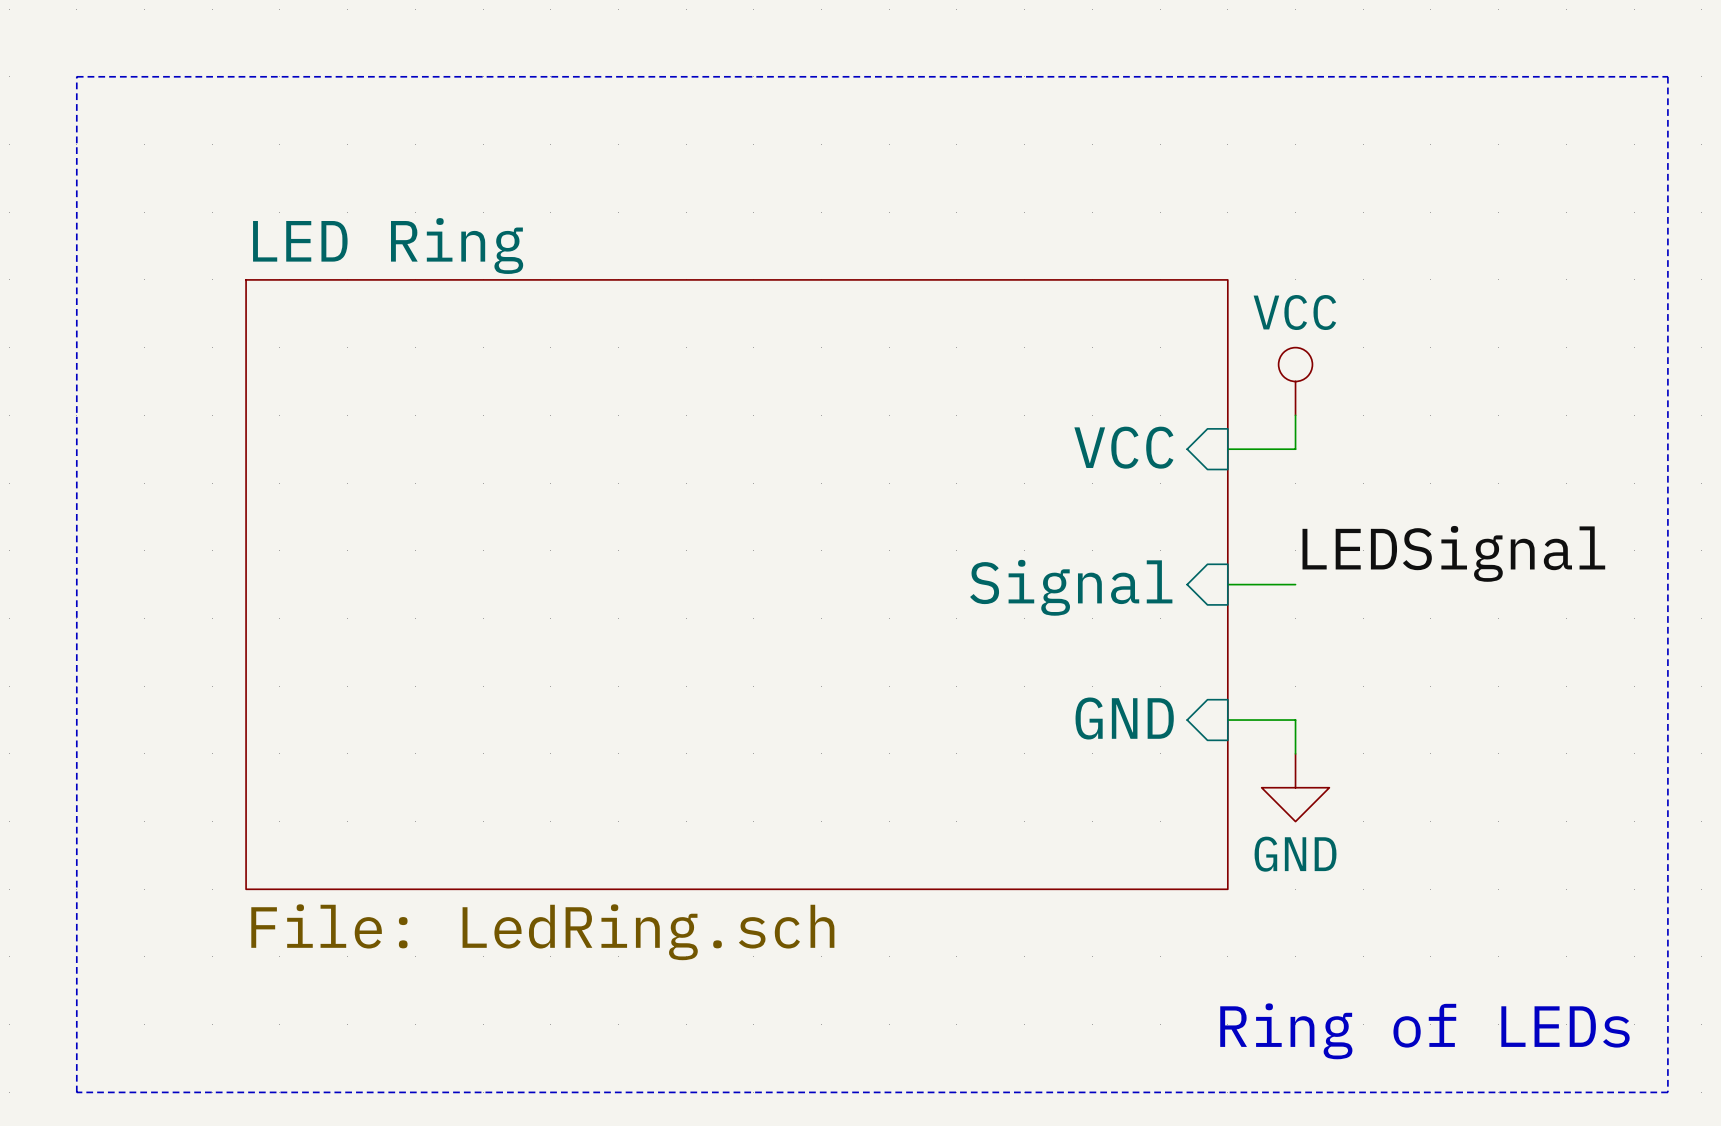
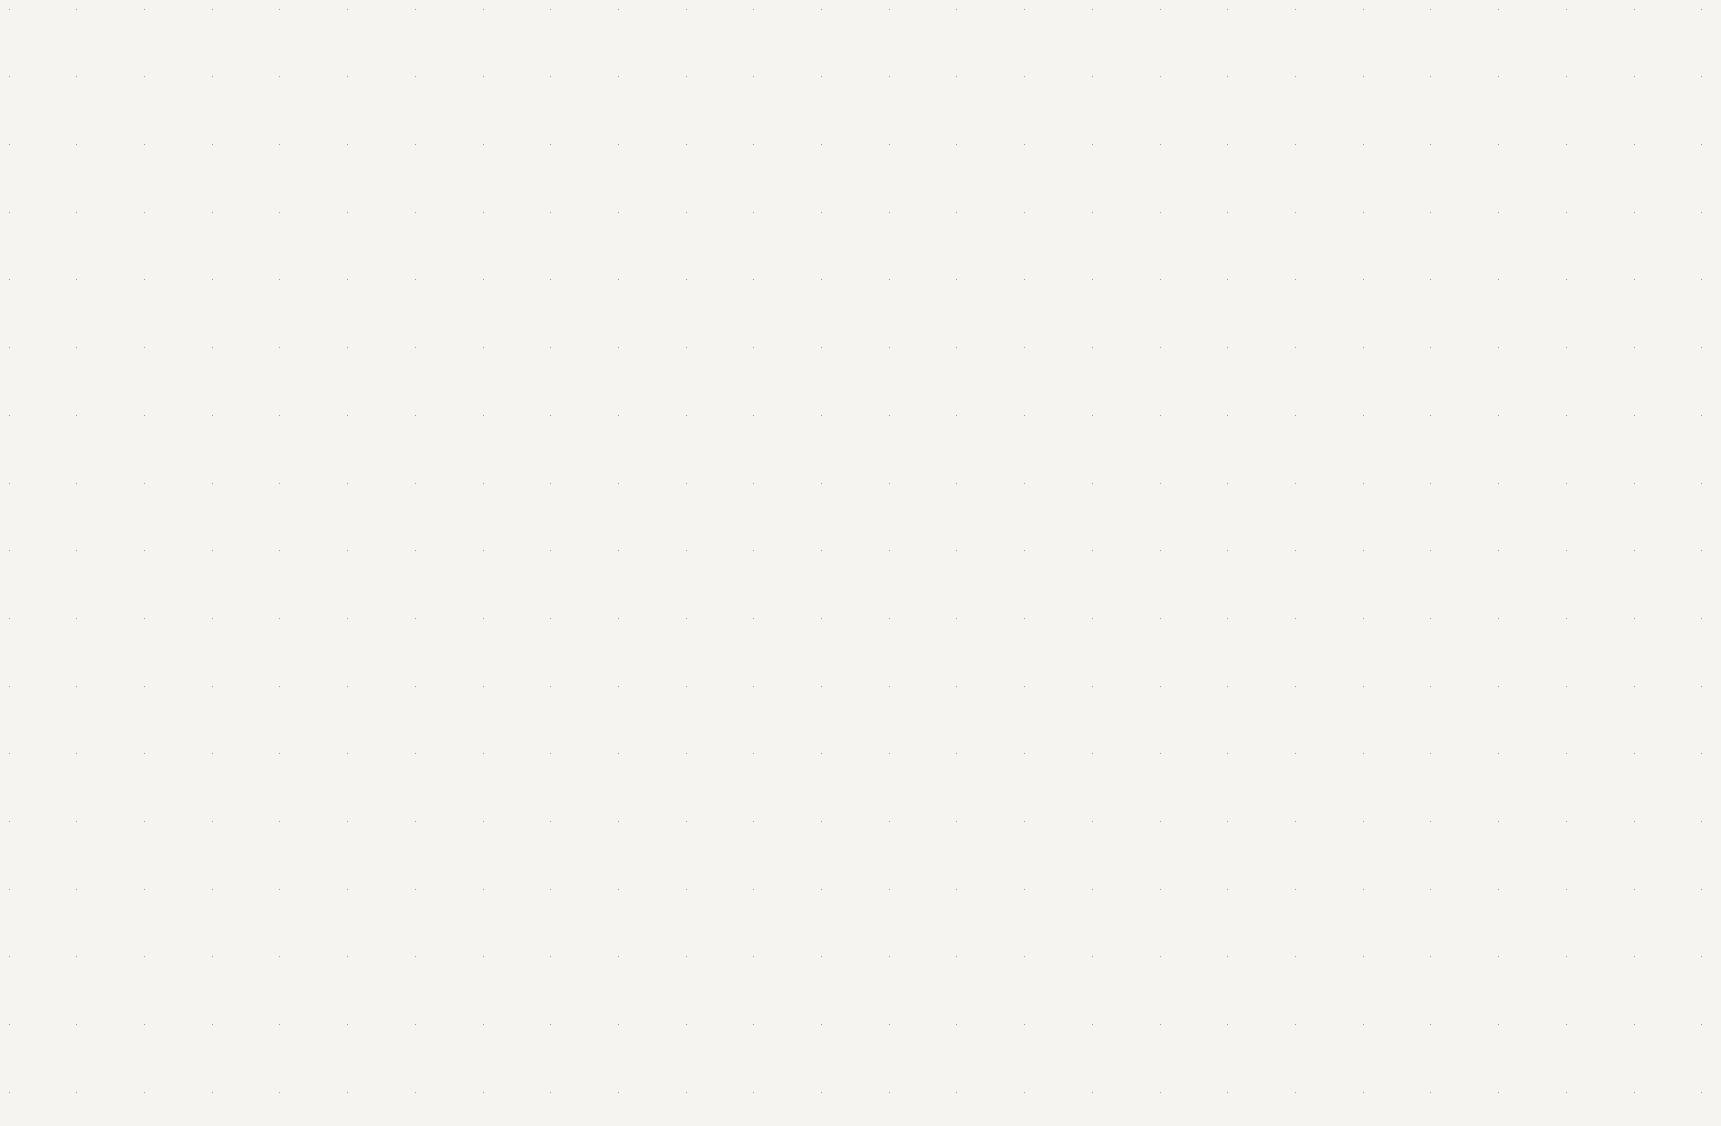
line: (76, 76) (1667, 76) (1667, 1092) (76, 1092) (76, 76) -> none
power symbol: VCC (1295, 381) -> none
wire: (1295, 415) (1295, 449) (1227, 449) -> none
sheet pin: VCC (1123, 447) -> none
label: LEDSignal (1453, 553) -> none
sheet LED Ring: File: LedRing.sch (736, 584) -> none
wire: (1227, 584) (1295, 584) -> none
sheet pin: Signal (1071, 587) -> none
sheet pin: GND (1124, 718) -> none
wire: (1227, 720) (1295, 720) (1295, 753) -> none
power symbol: GND (1295, 787) -> none
text: Ring of LEDs (1424, 1031) -> none

